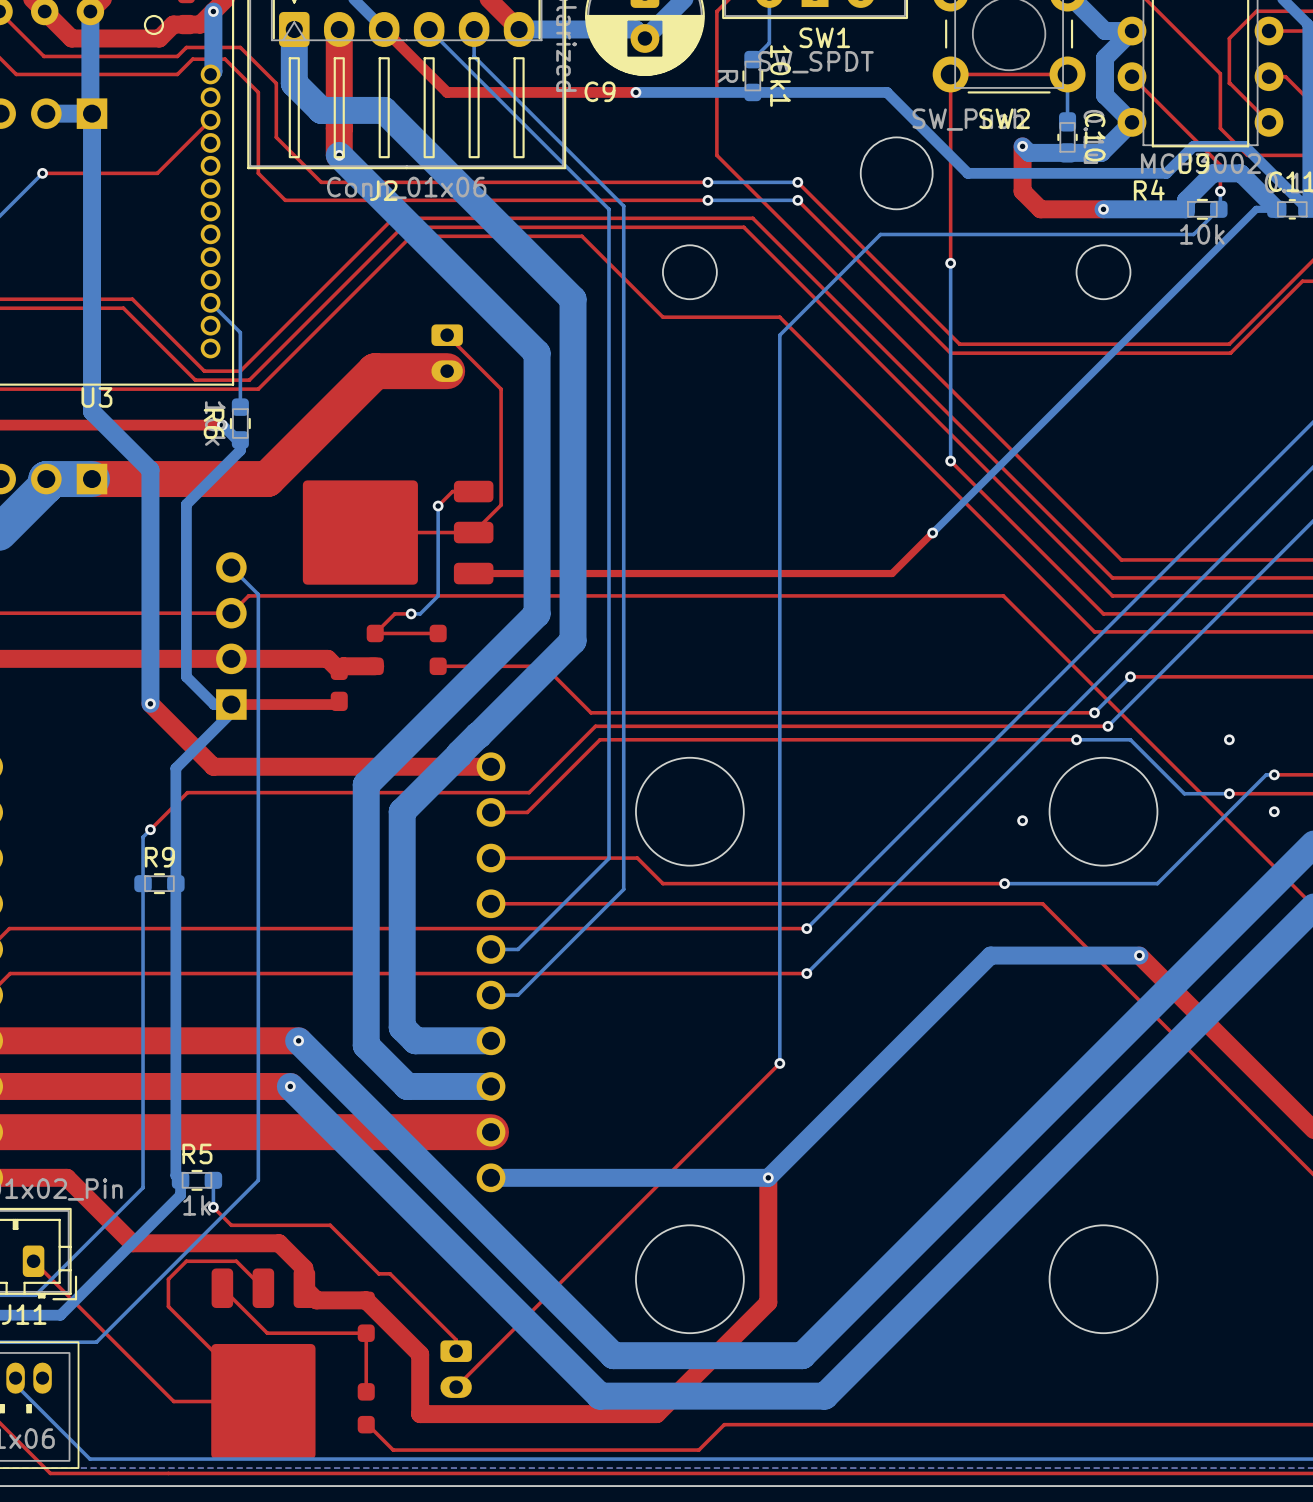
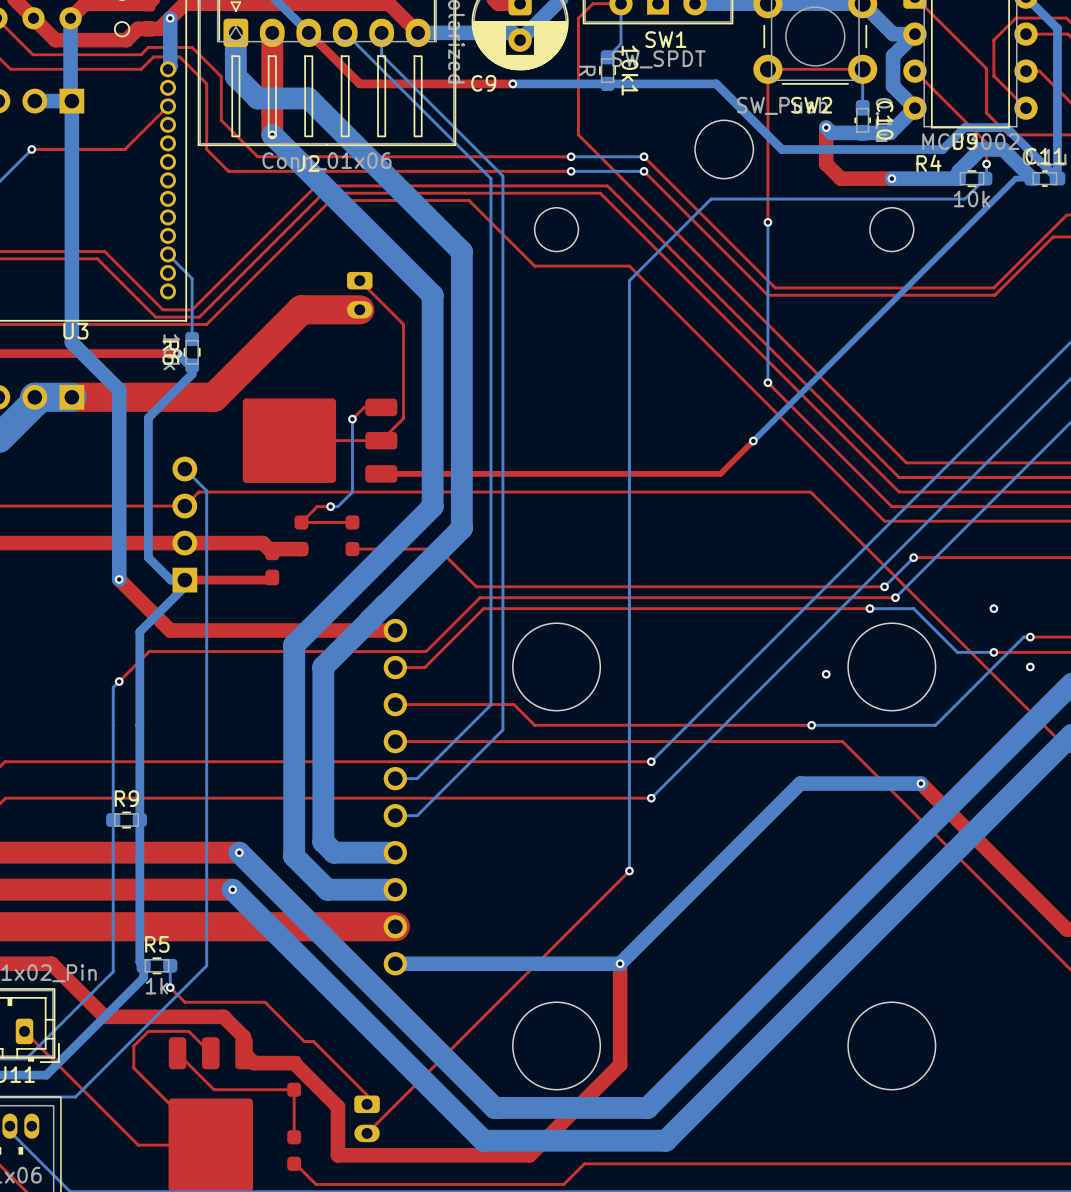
R9 position: (159, 883) -> (126, 820)

